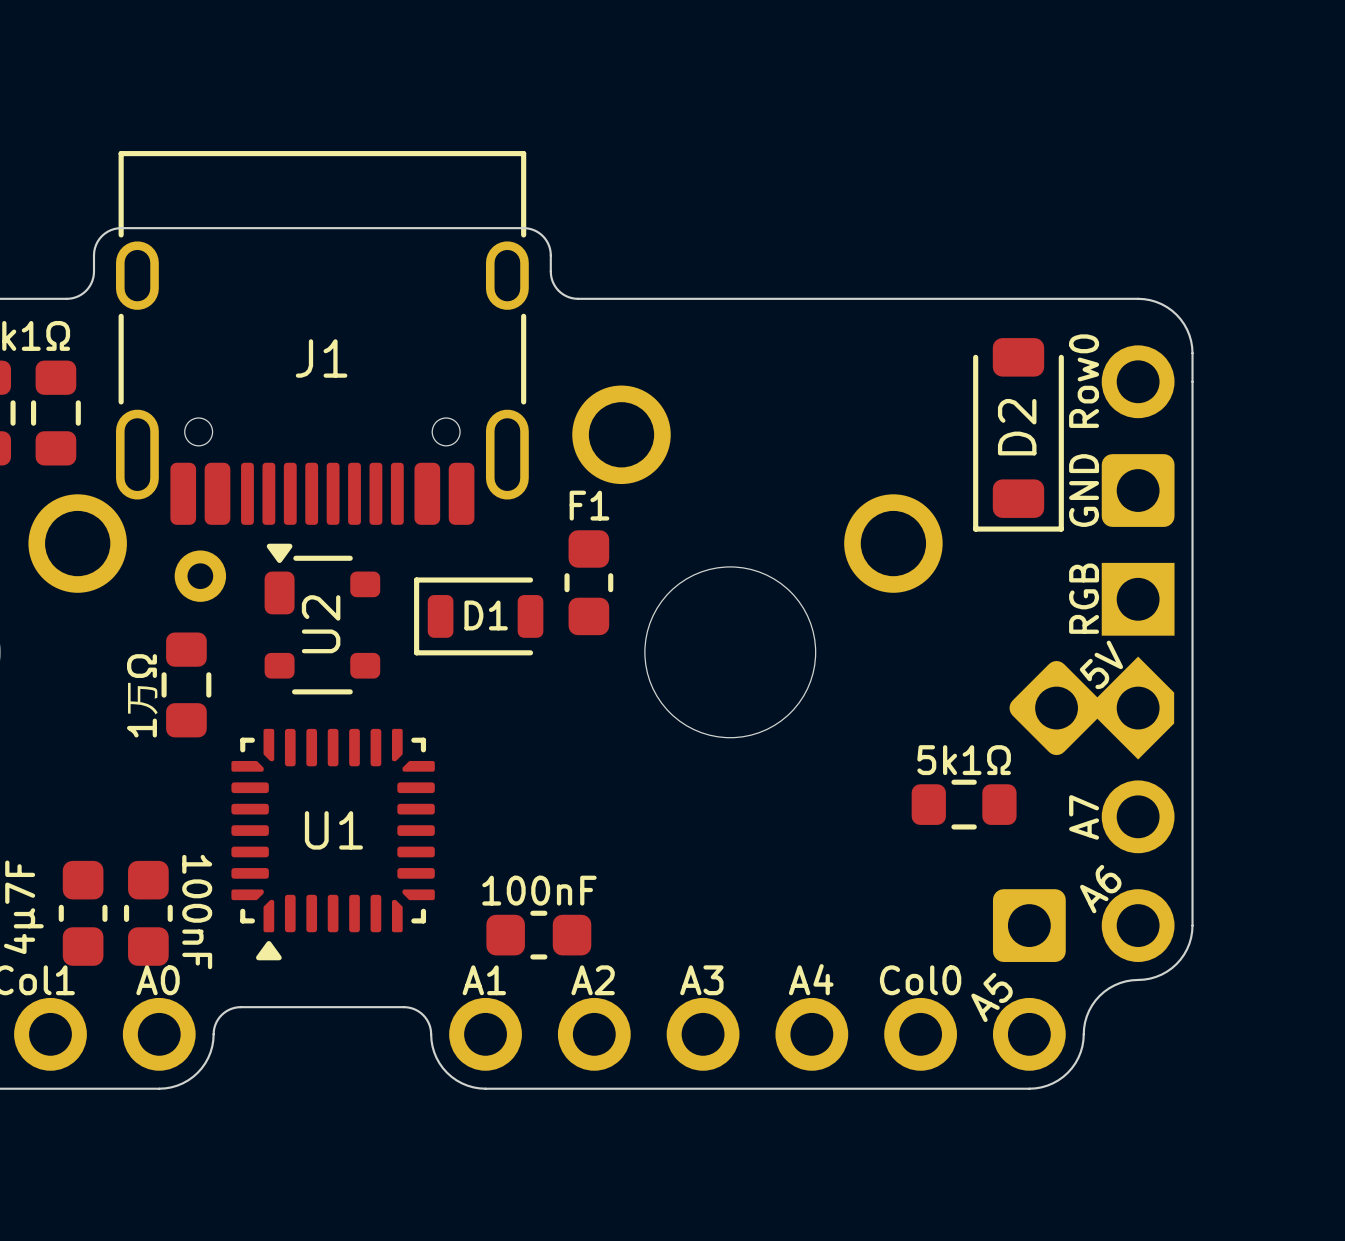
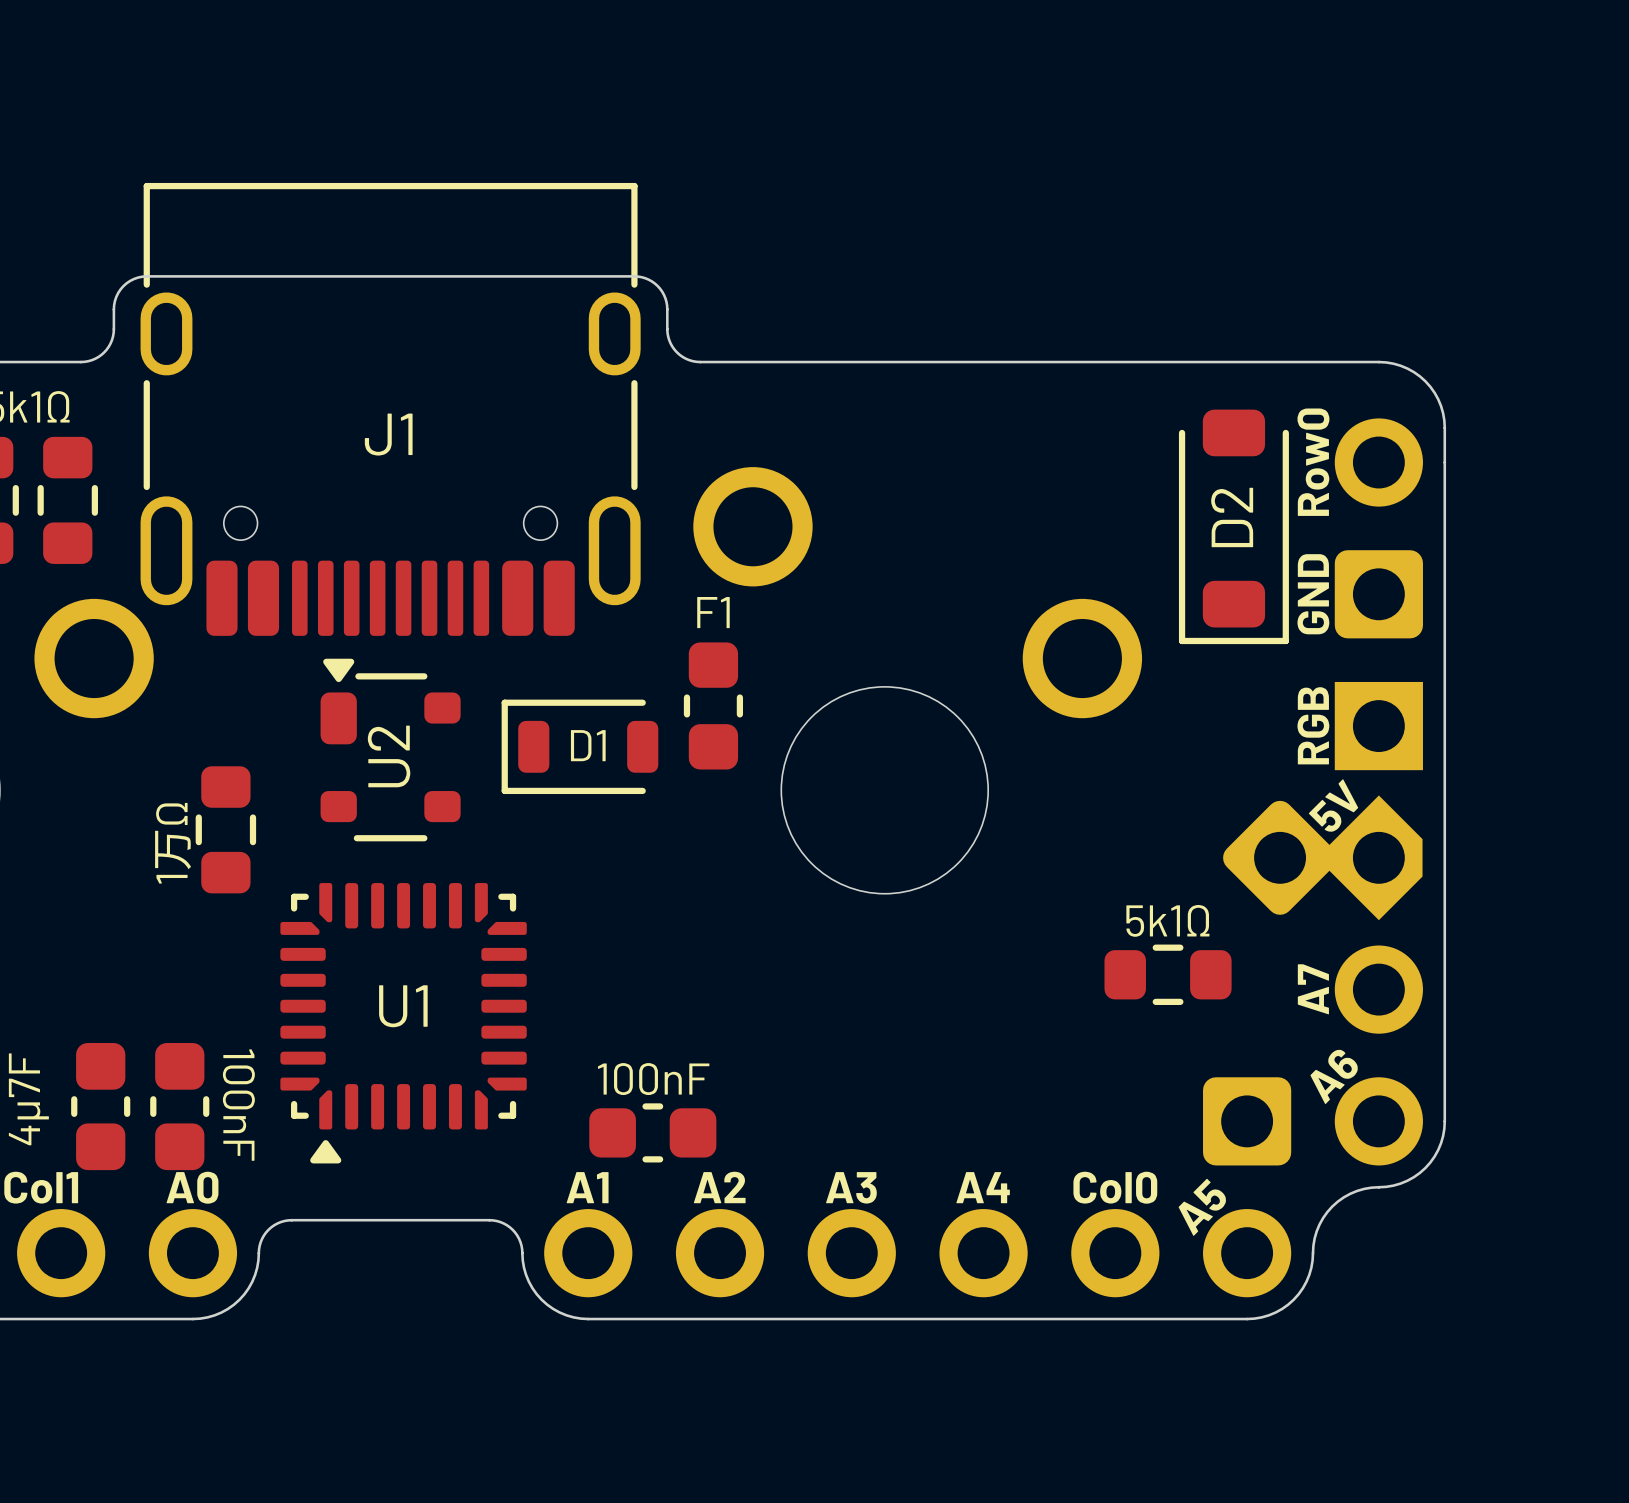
part: (200, 576) -> none

